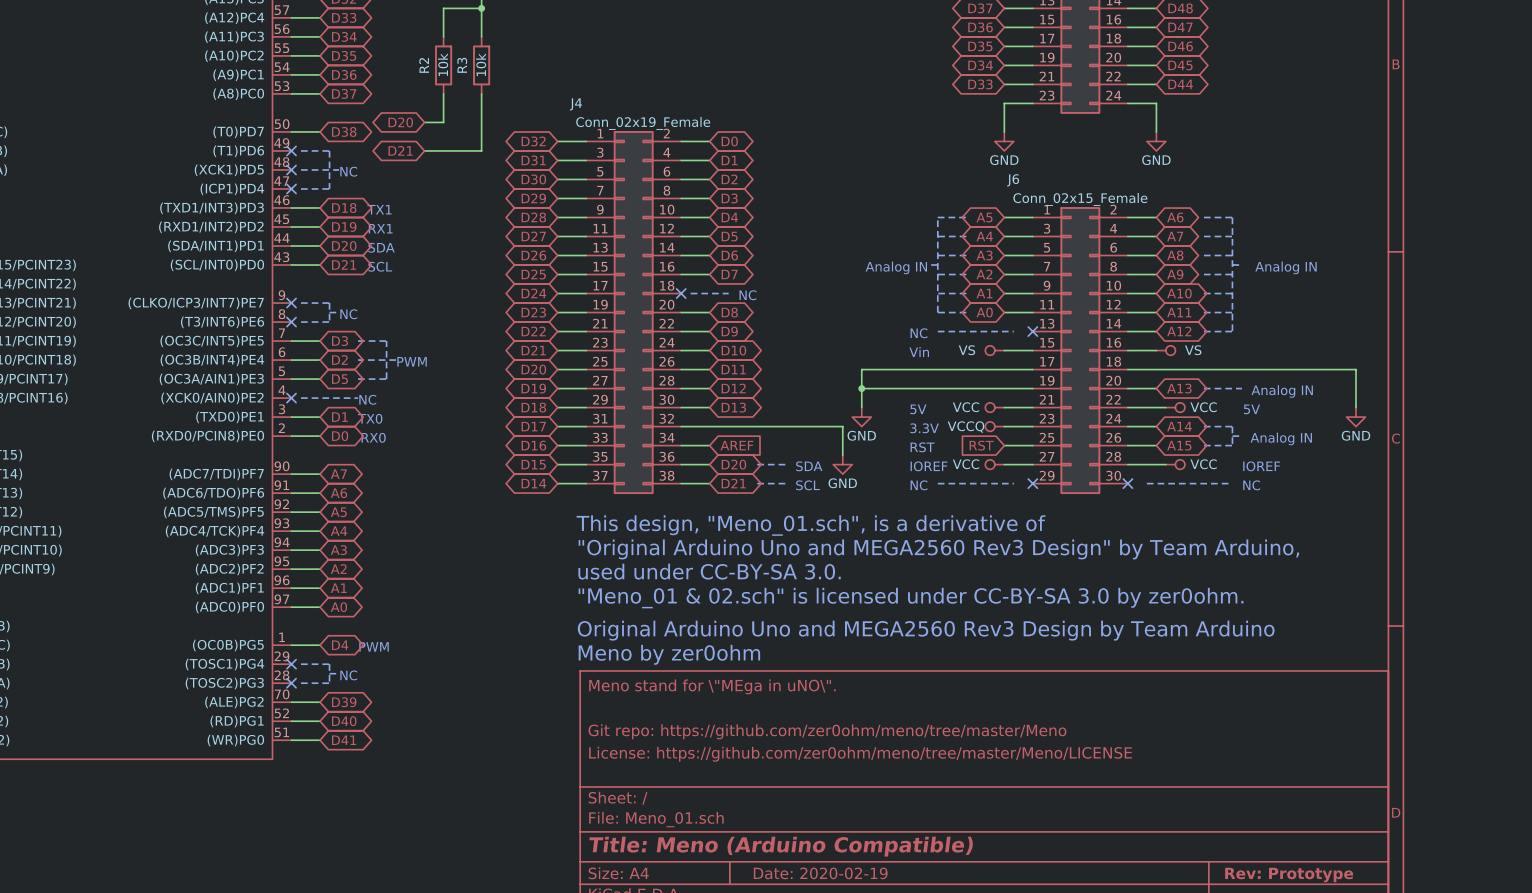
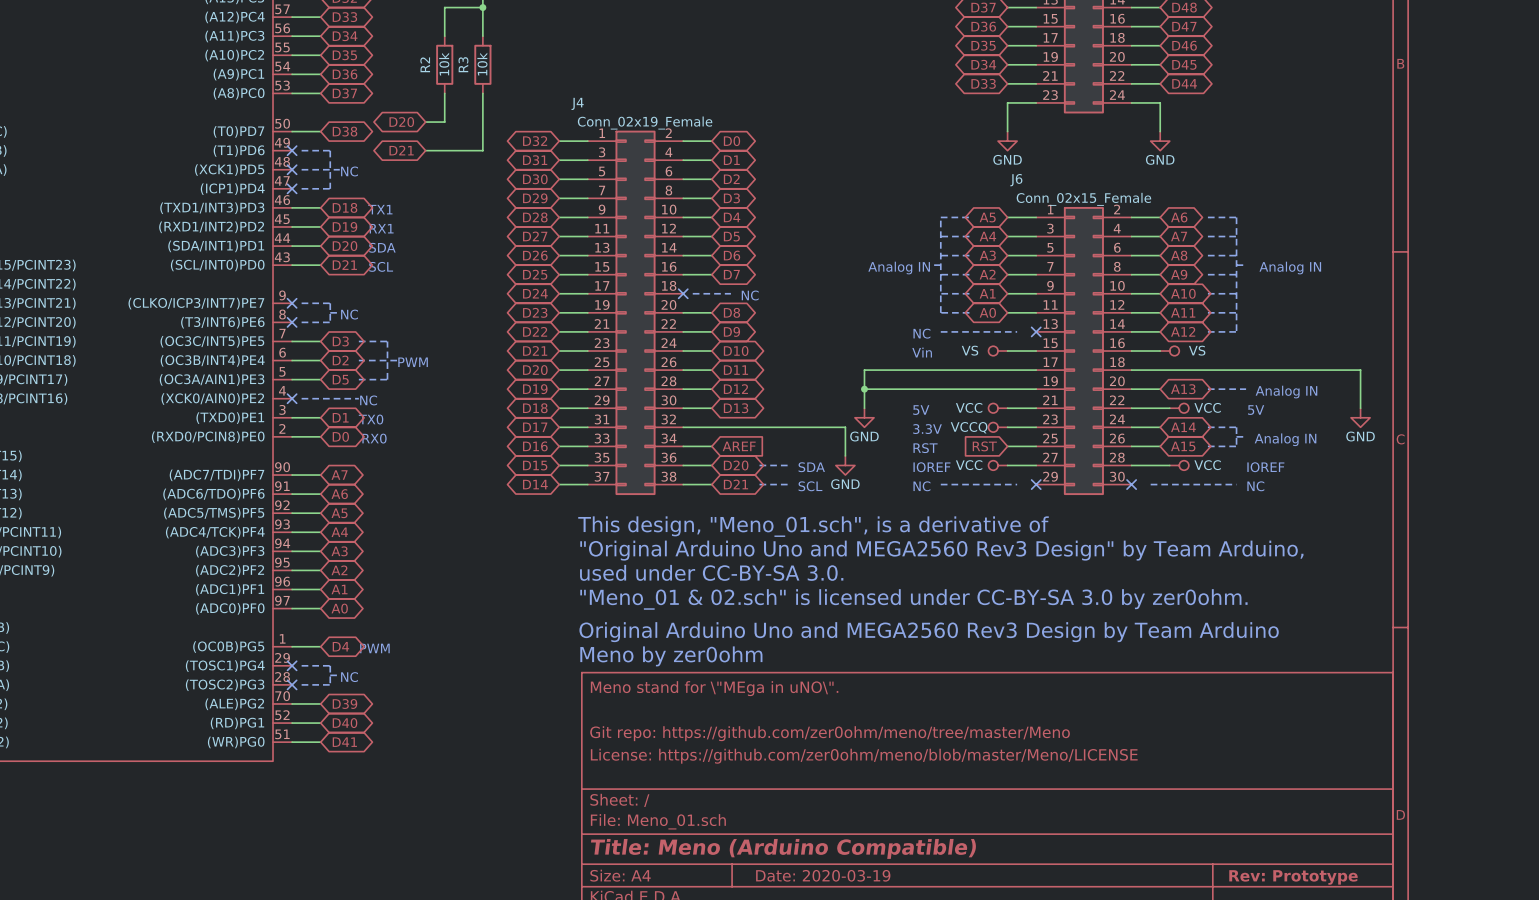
title block: License: https://github.com/zer0ohm/meno/tree/master/Meno/LICENSE (860, 754) -> License: https://github.com/zer0ohm/meno/blob/master/Meno/LICENSE (864, 756)
title block: Date: 2020-02-19 (820, 873) -> Date: 2020-03-19 (823, 875)

